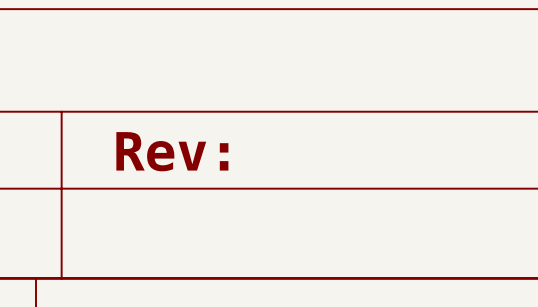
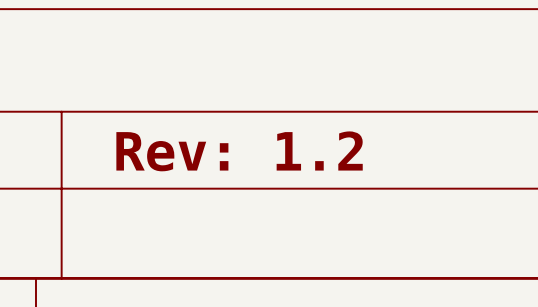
title block: Rev: (172, 151) -> Rev: 1.2 (239, 151)

